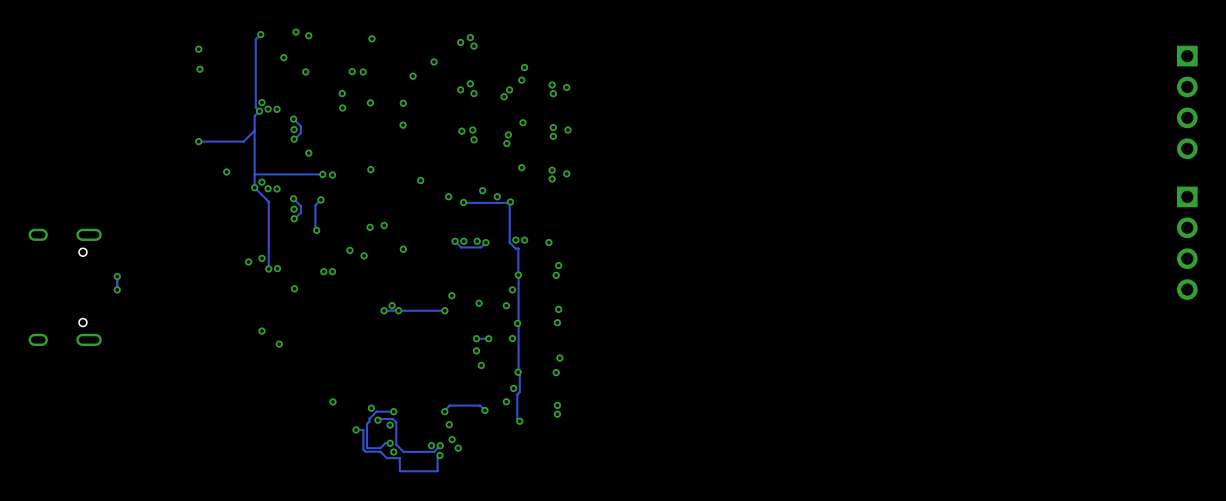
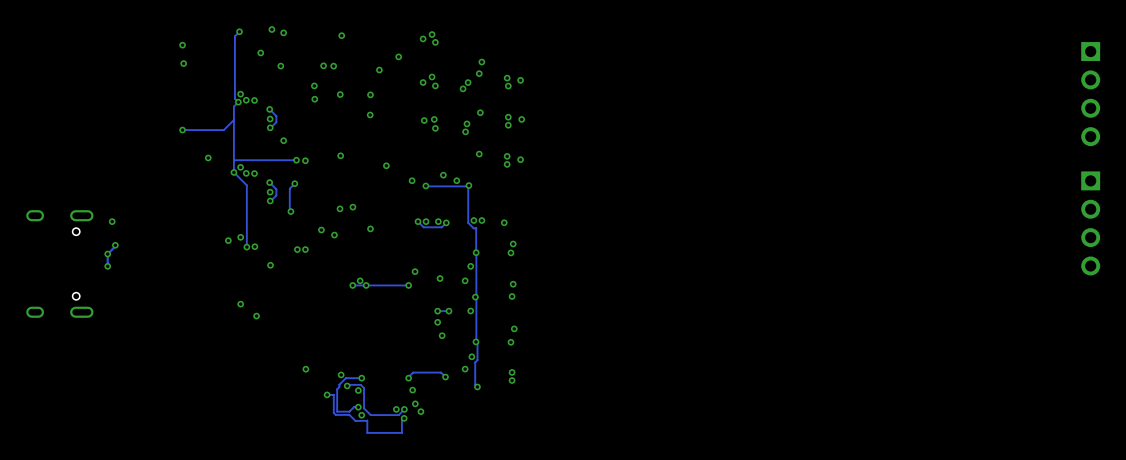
via: none -> (112, 221)
track: none -> (115, 245) (107, 254)
via: none -> (115, 245)

